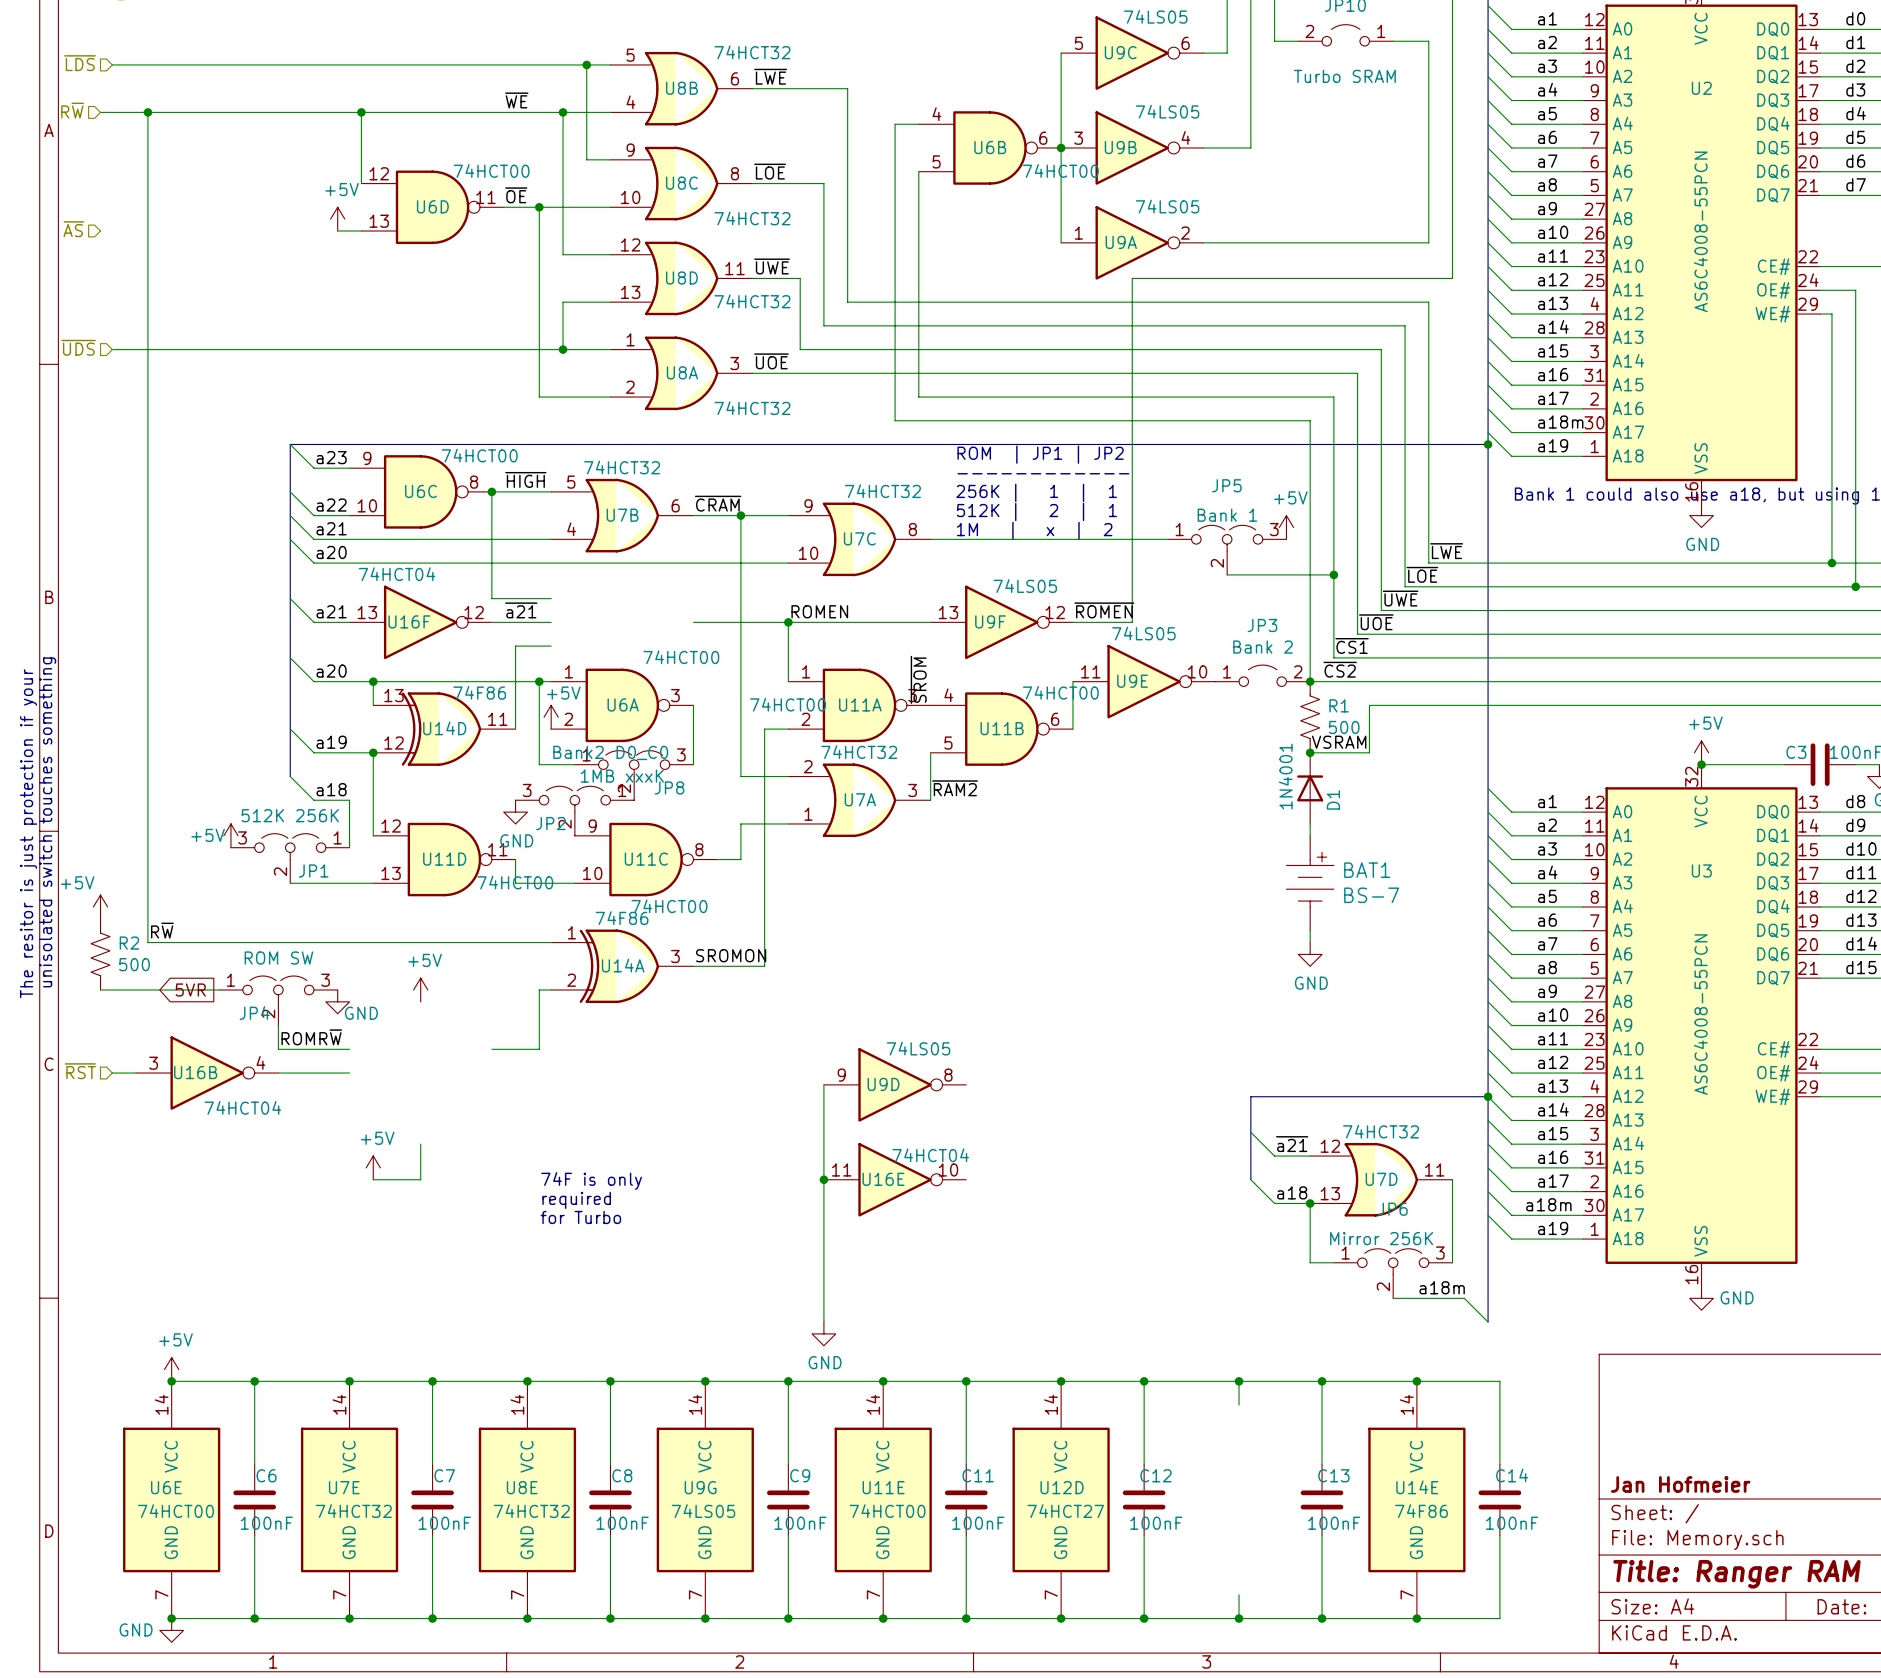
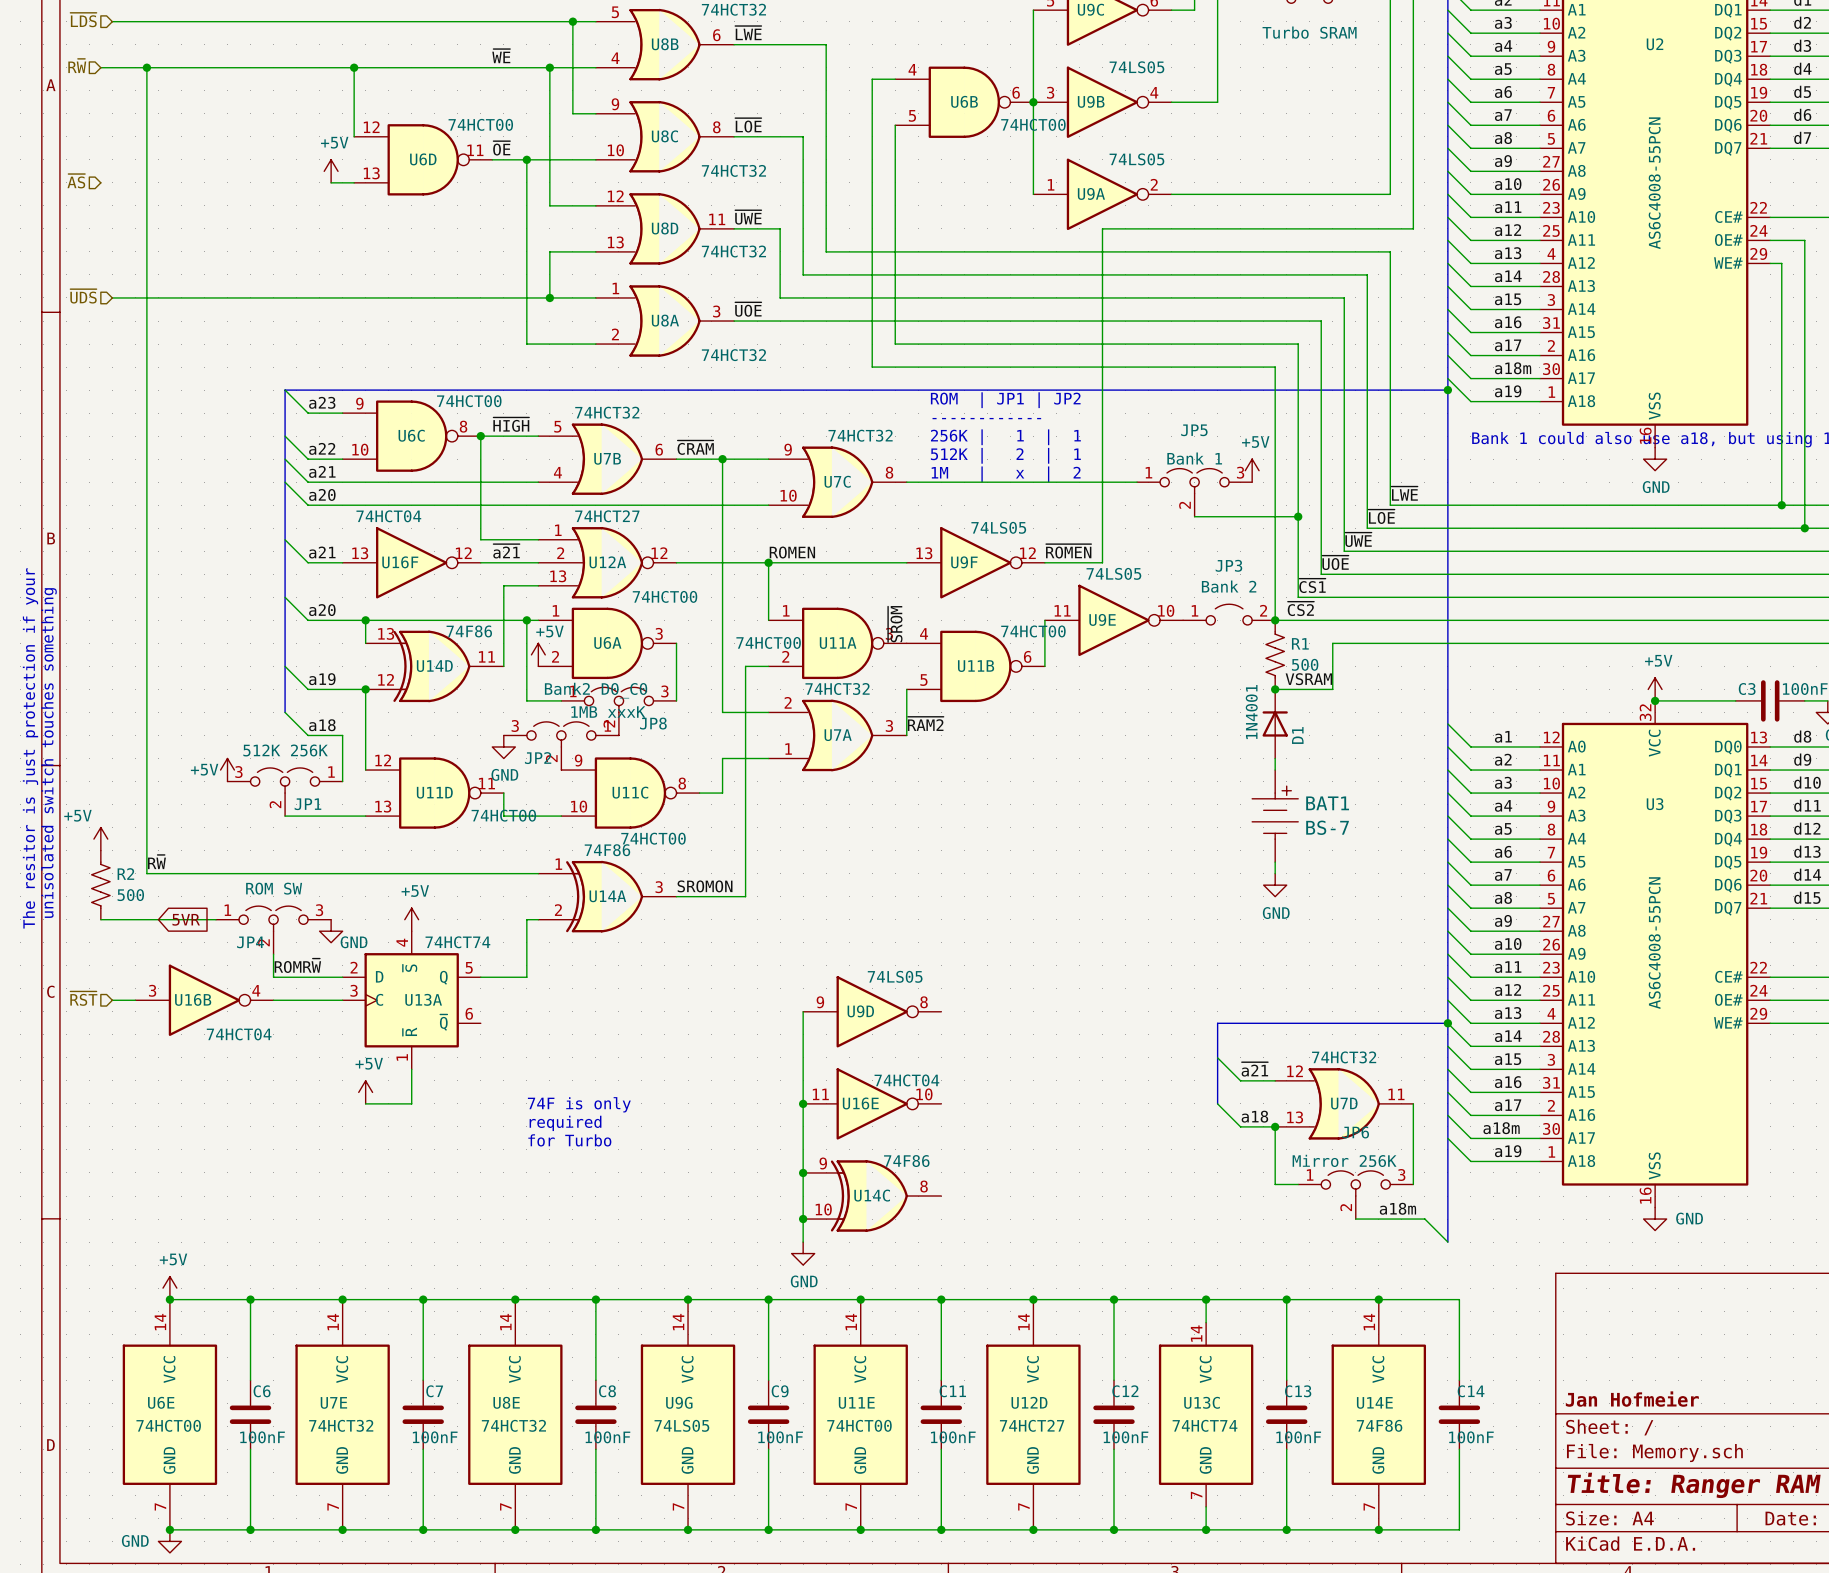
U12A: none -> 74HCT27 (607, 562)
U13A: none -> 74HCT74 (411, 1000)
junction: none -> (803, 1172)
U14C: none -> 74F86 (872, 1196)
junction: none -> (803, 1219)
U13C: none -> 74HCT74 (1206, 1414)

